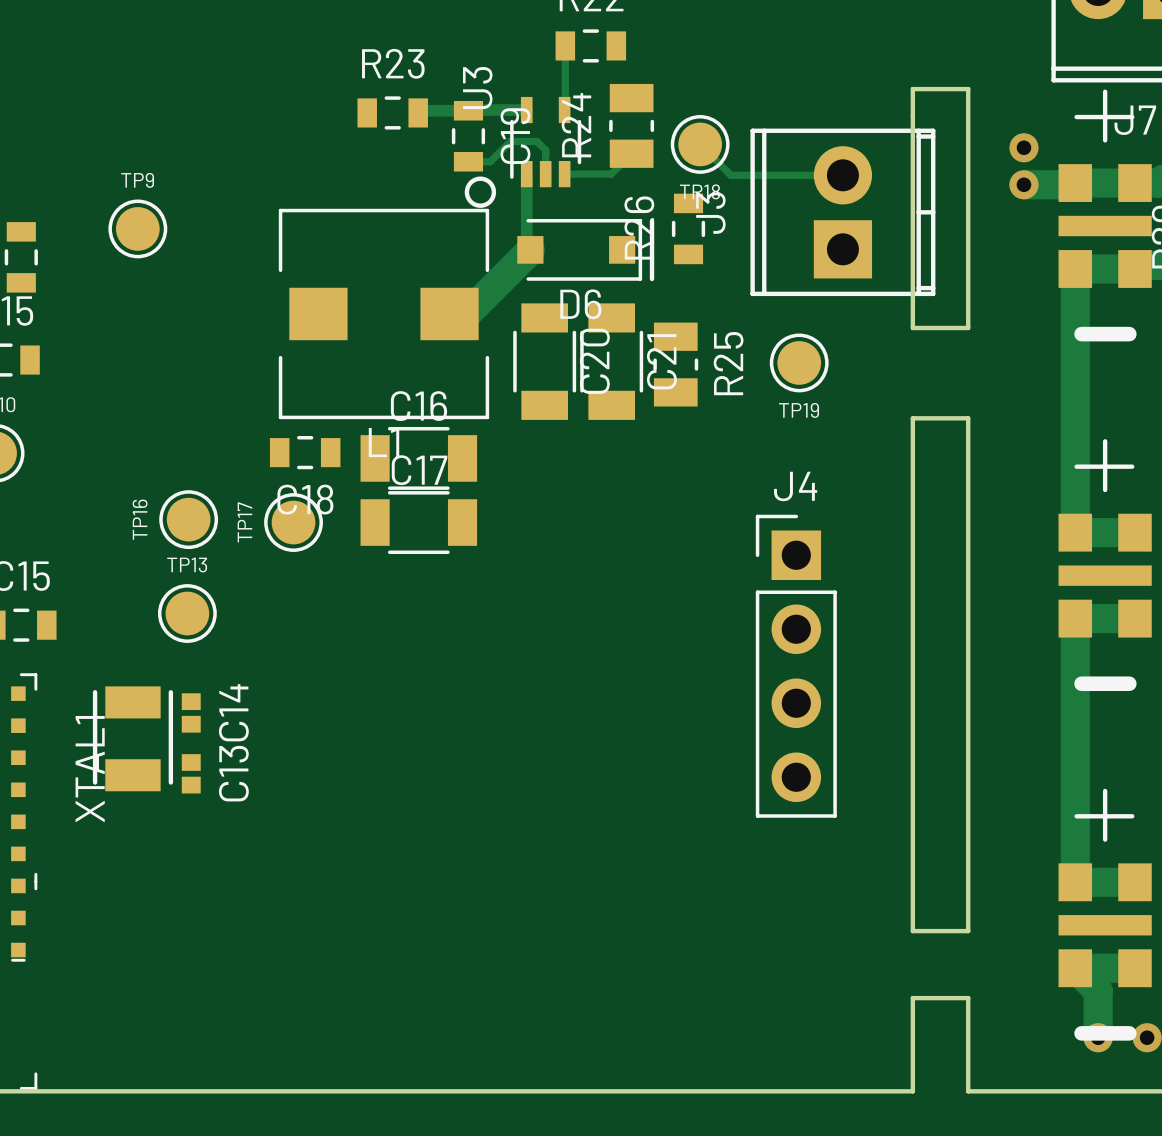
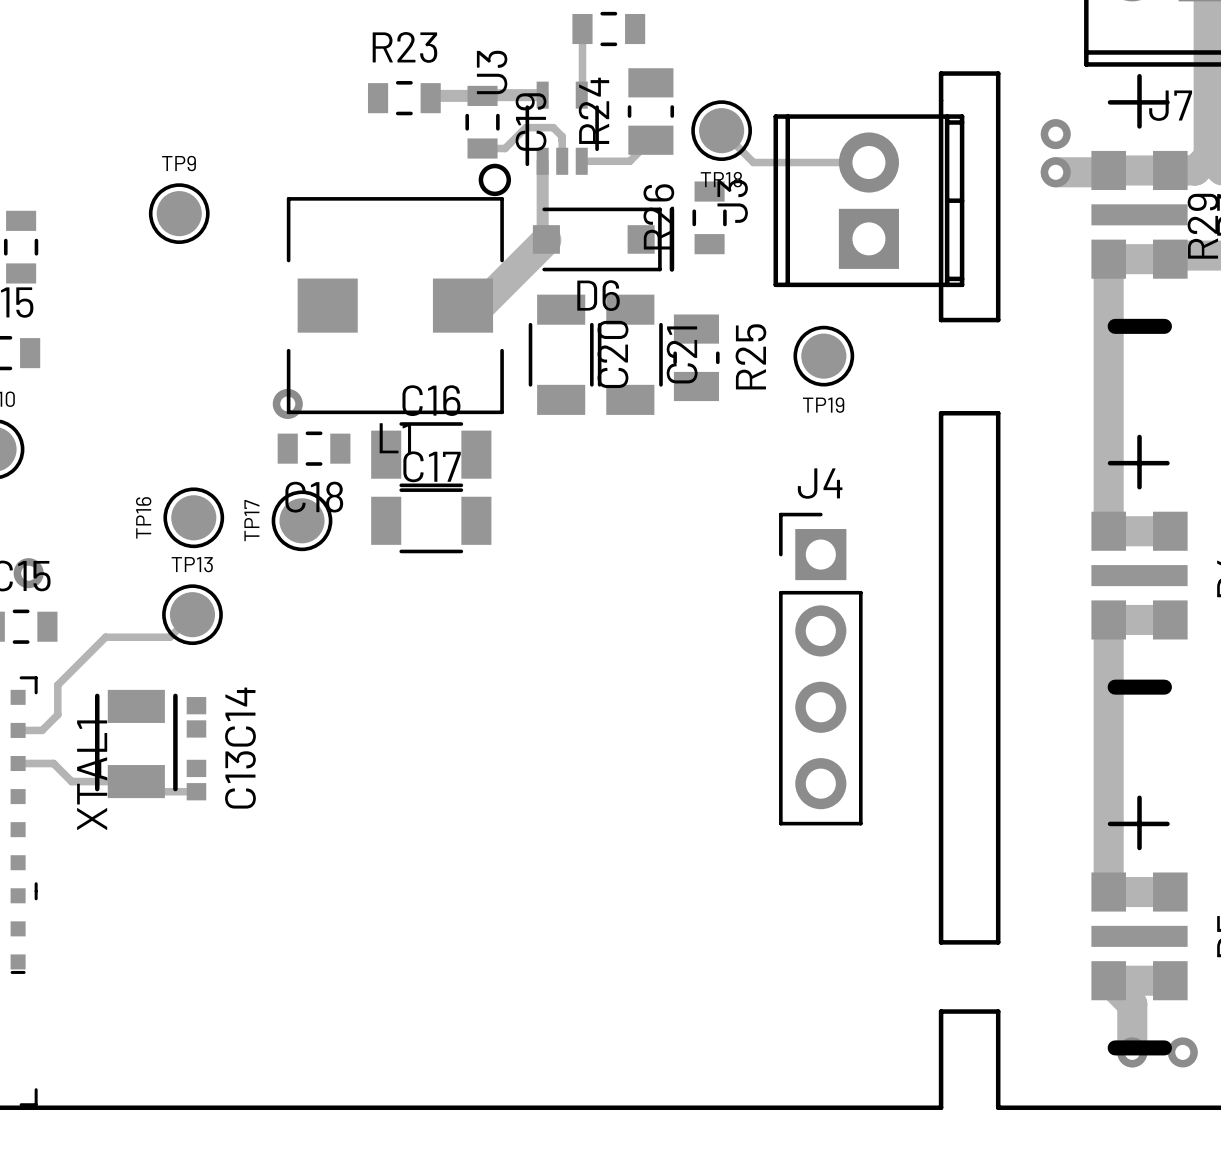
TP9 position: (137, 228) -> (179, 213)
via: none -> (287, 403)
via: none -> (28, 573)
track: none -> (192, 614) (169, 637) (105, 637) (57, 685) (57, 714) (42, 730) (18, 730)
track: none -> (18, 763) (53, 763) (71, 781) (136, 781) (146, 791) (196, 791)

